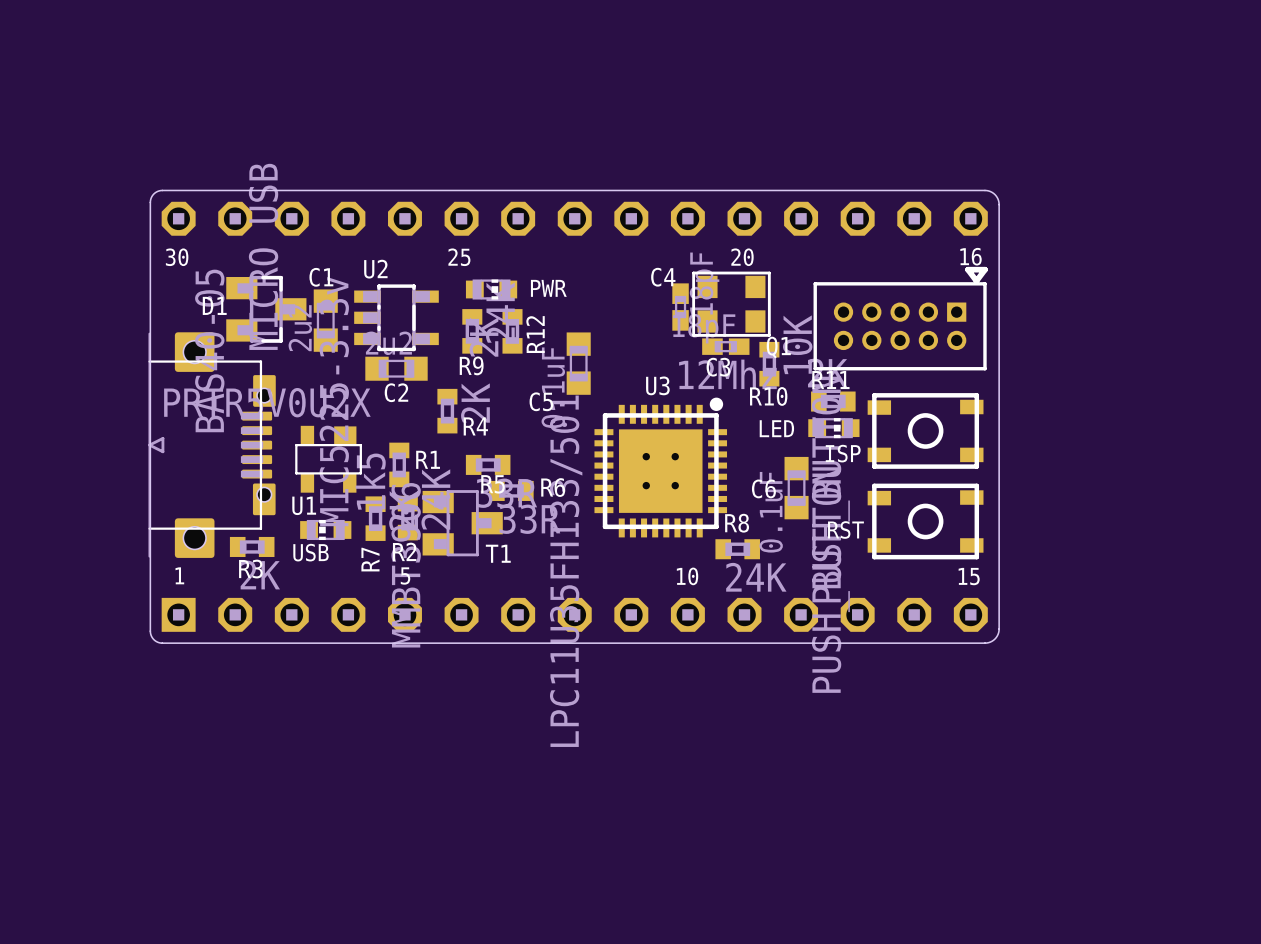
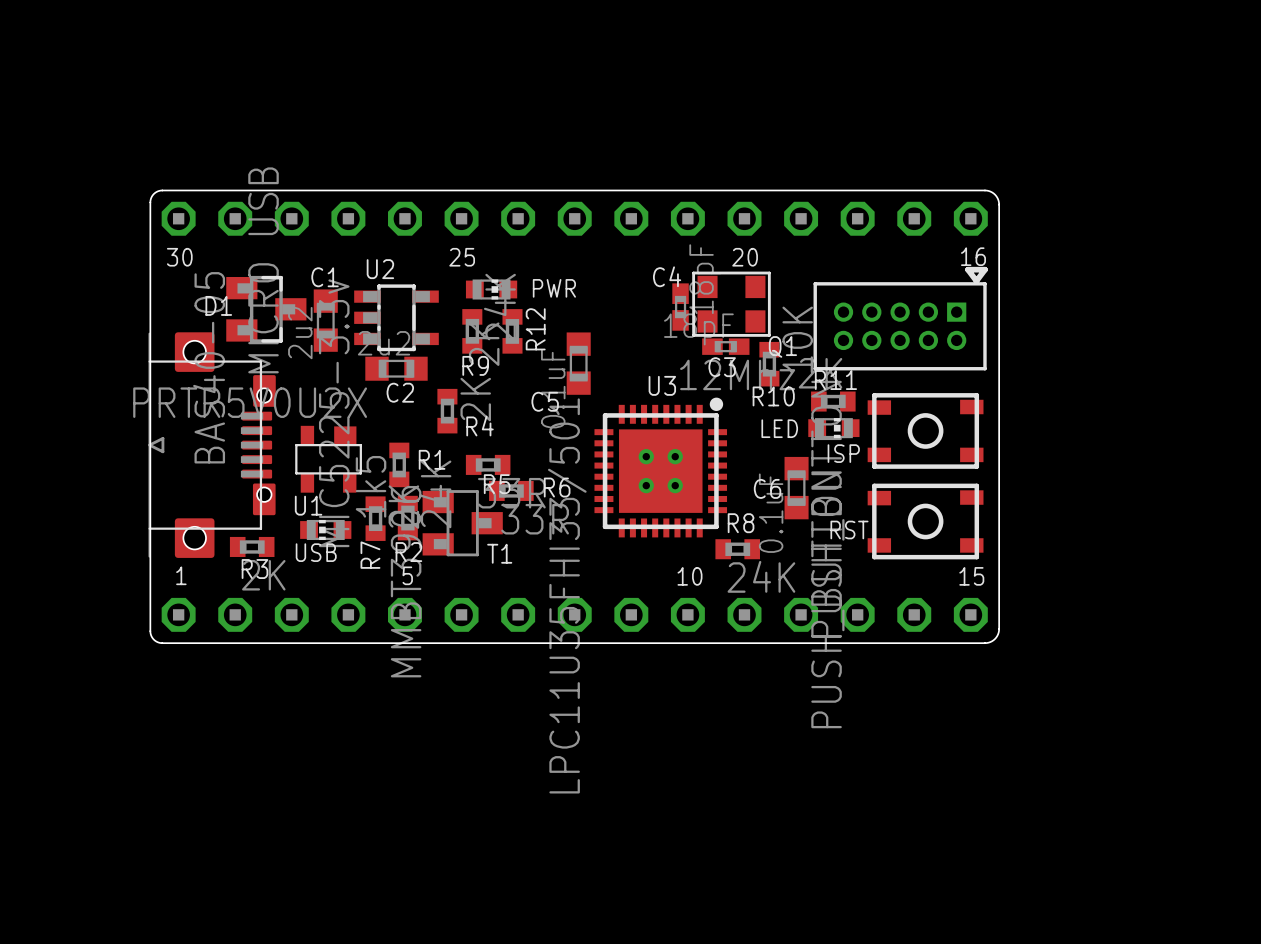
part footprint: [161, 597, 196, 632] -> [161, 597, 196, 632]

